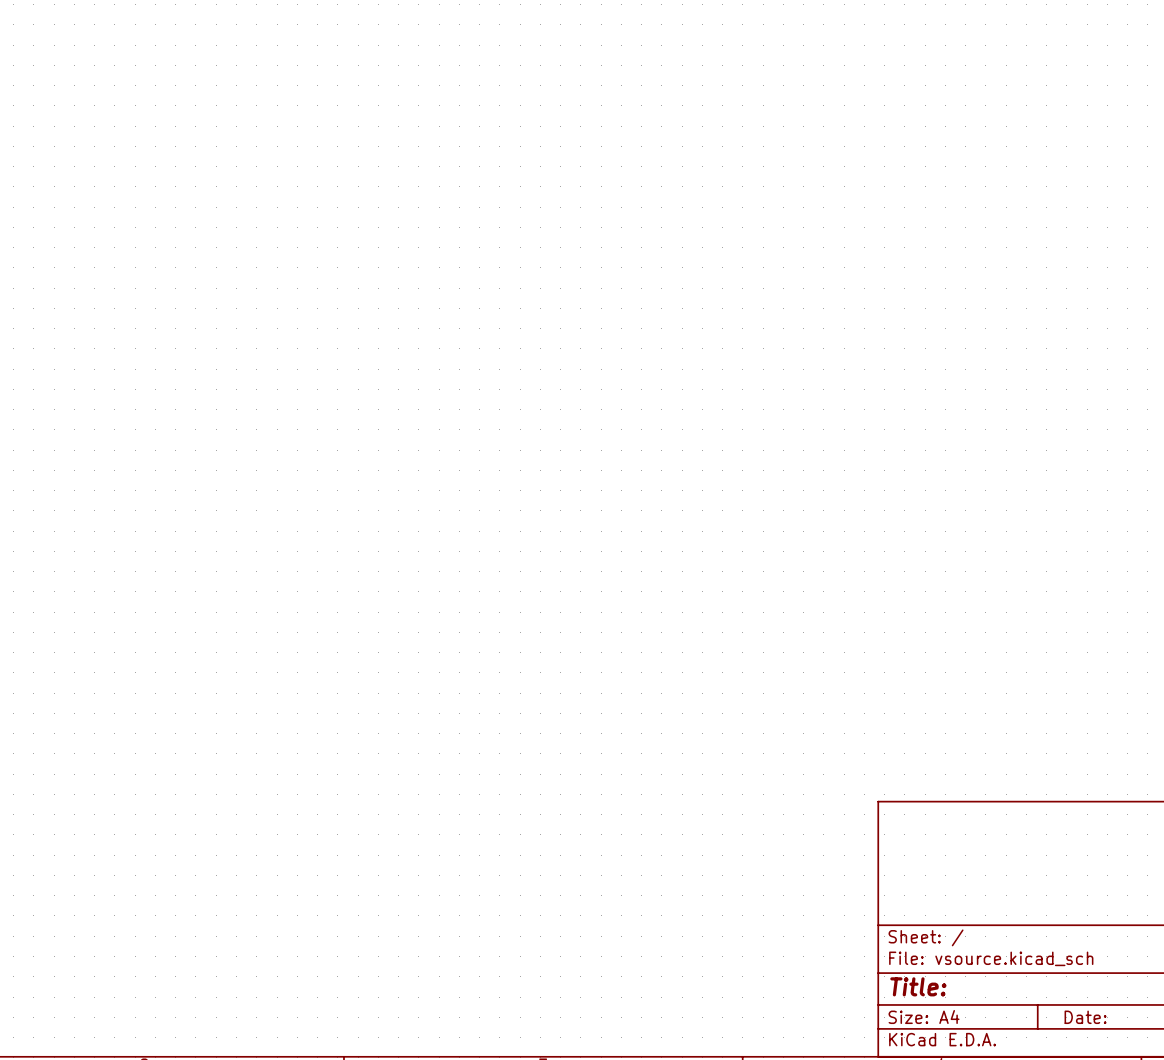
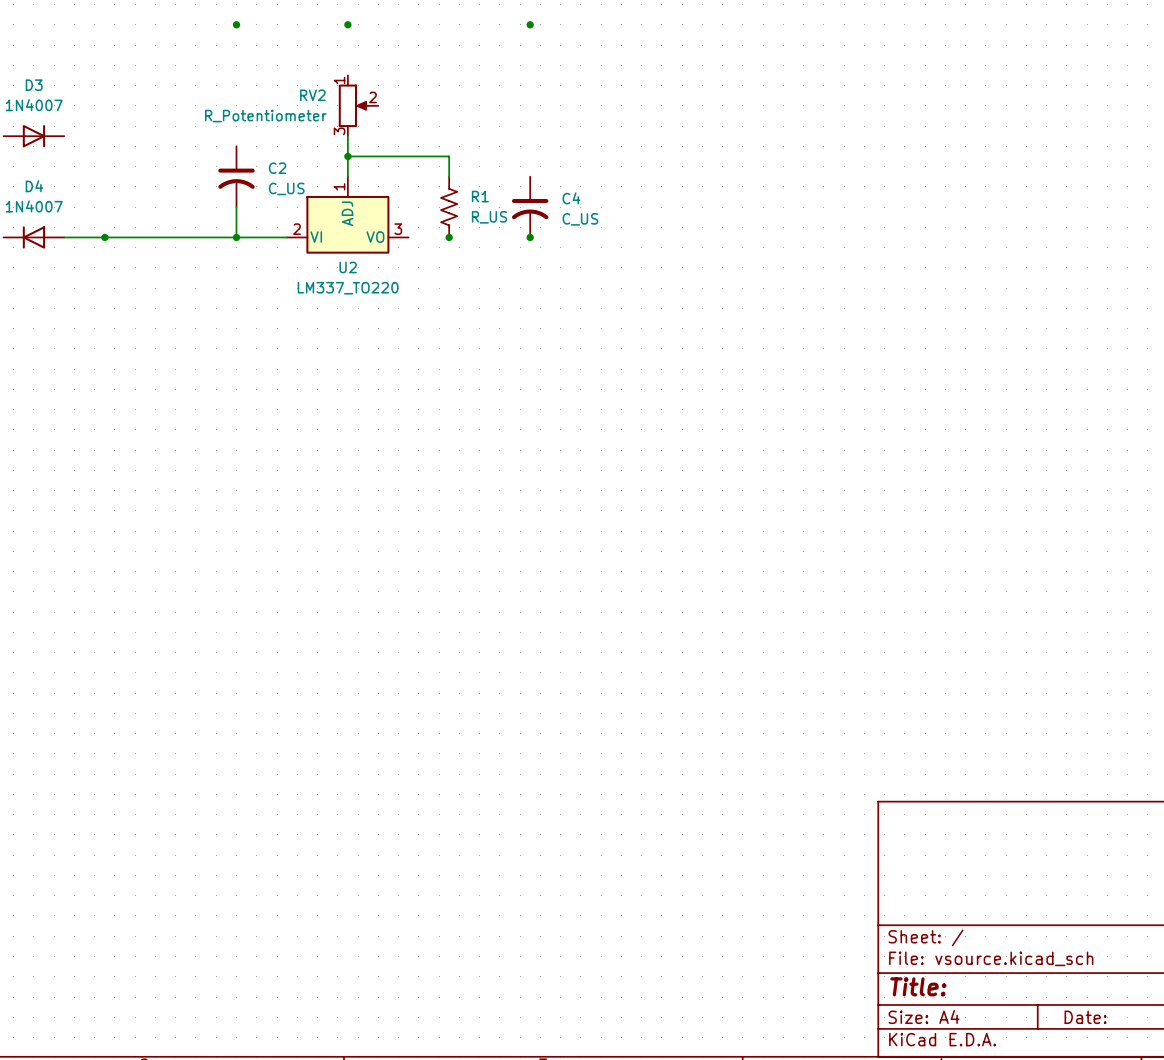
junction: none -> (236, 24)
junction: none -> (347, 24)
junction: none -> (530, 24)
RV2: none -> R_Potentiometer (358, 105)
D3: none -> 1N4007 (33, 136)
wire: none -> (347, 136) (347, 176)
wire: none -> (347, 156) (449, 156) (449, 176)
junction: none -> (347, 156)
C2: none -> C_US (236, 176)
wire: none -> (236, 207) (236, 237)
R1: none -> R_US (449, 207)
C4: none -> C_US (530, 207)
U2: none -> LM337_TO220 (347, 215)
D4: none -> 1N4007 (33, 237)
wire: none -> (64, 237) (287, 237)
junction: none -> (104, 237)
junction: none -> (236, 237)
junction: none -> (449, 237)
junction: none -> (530, 237)

